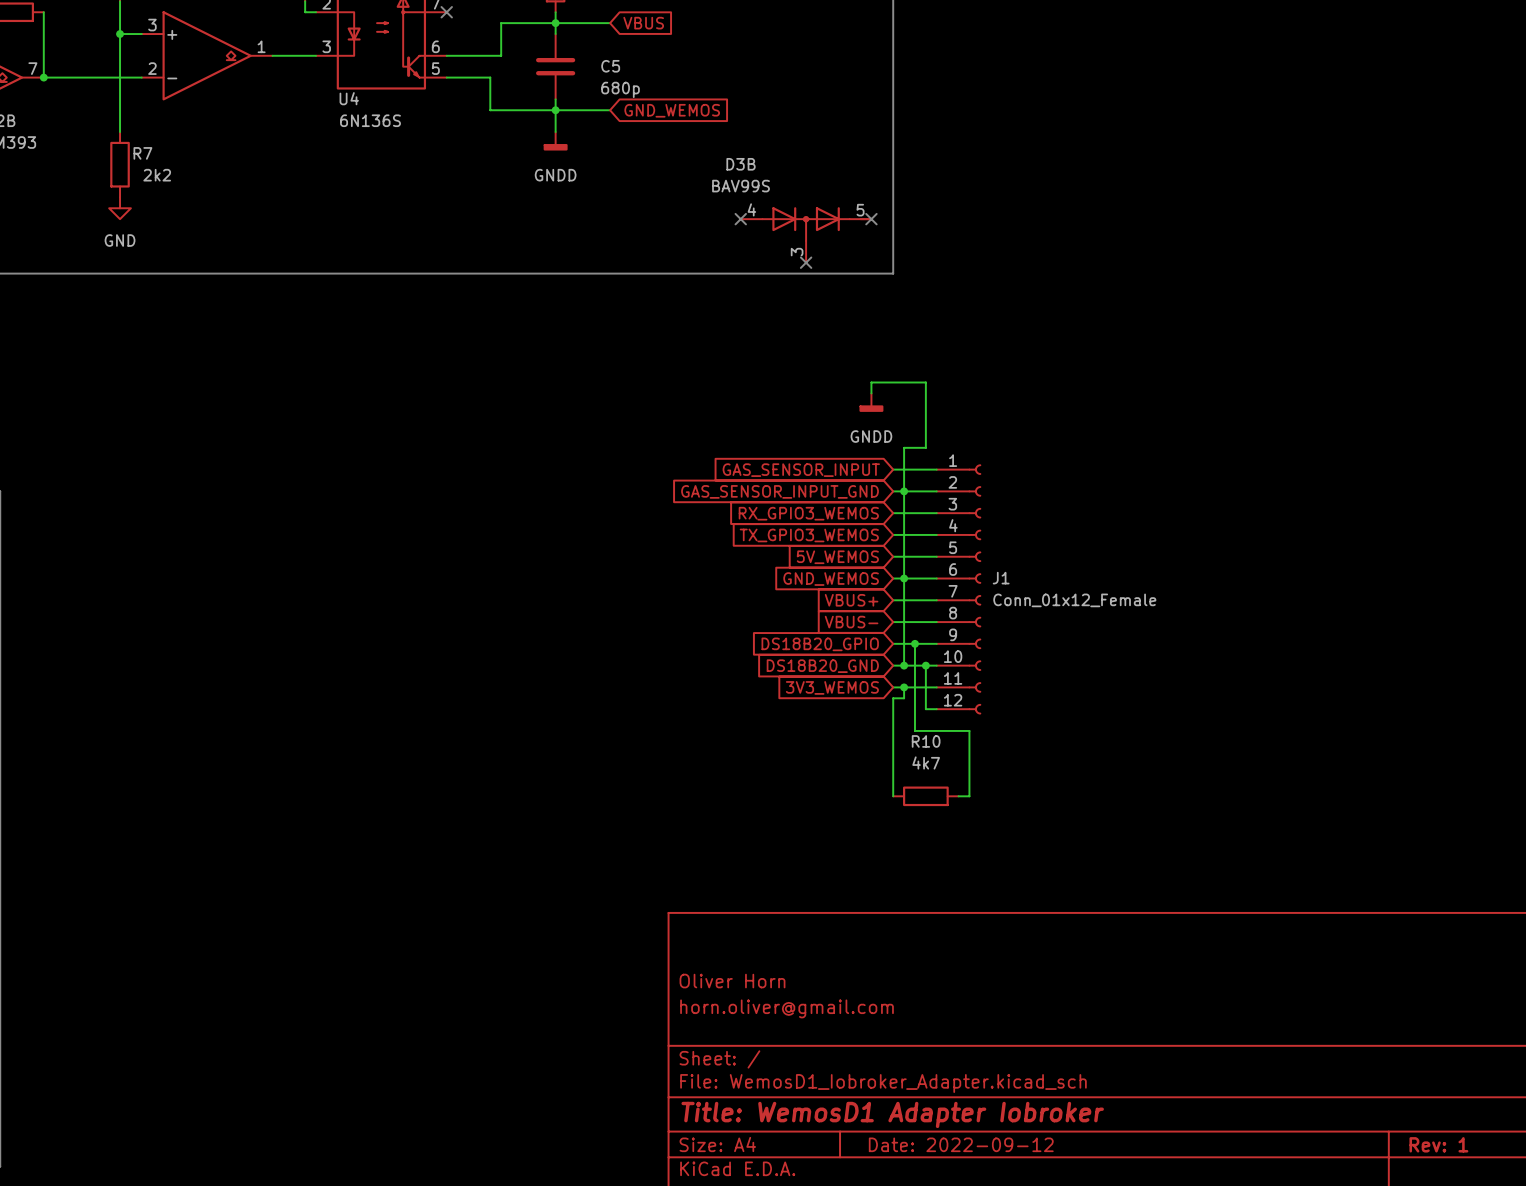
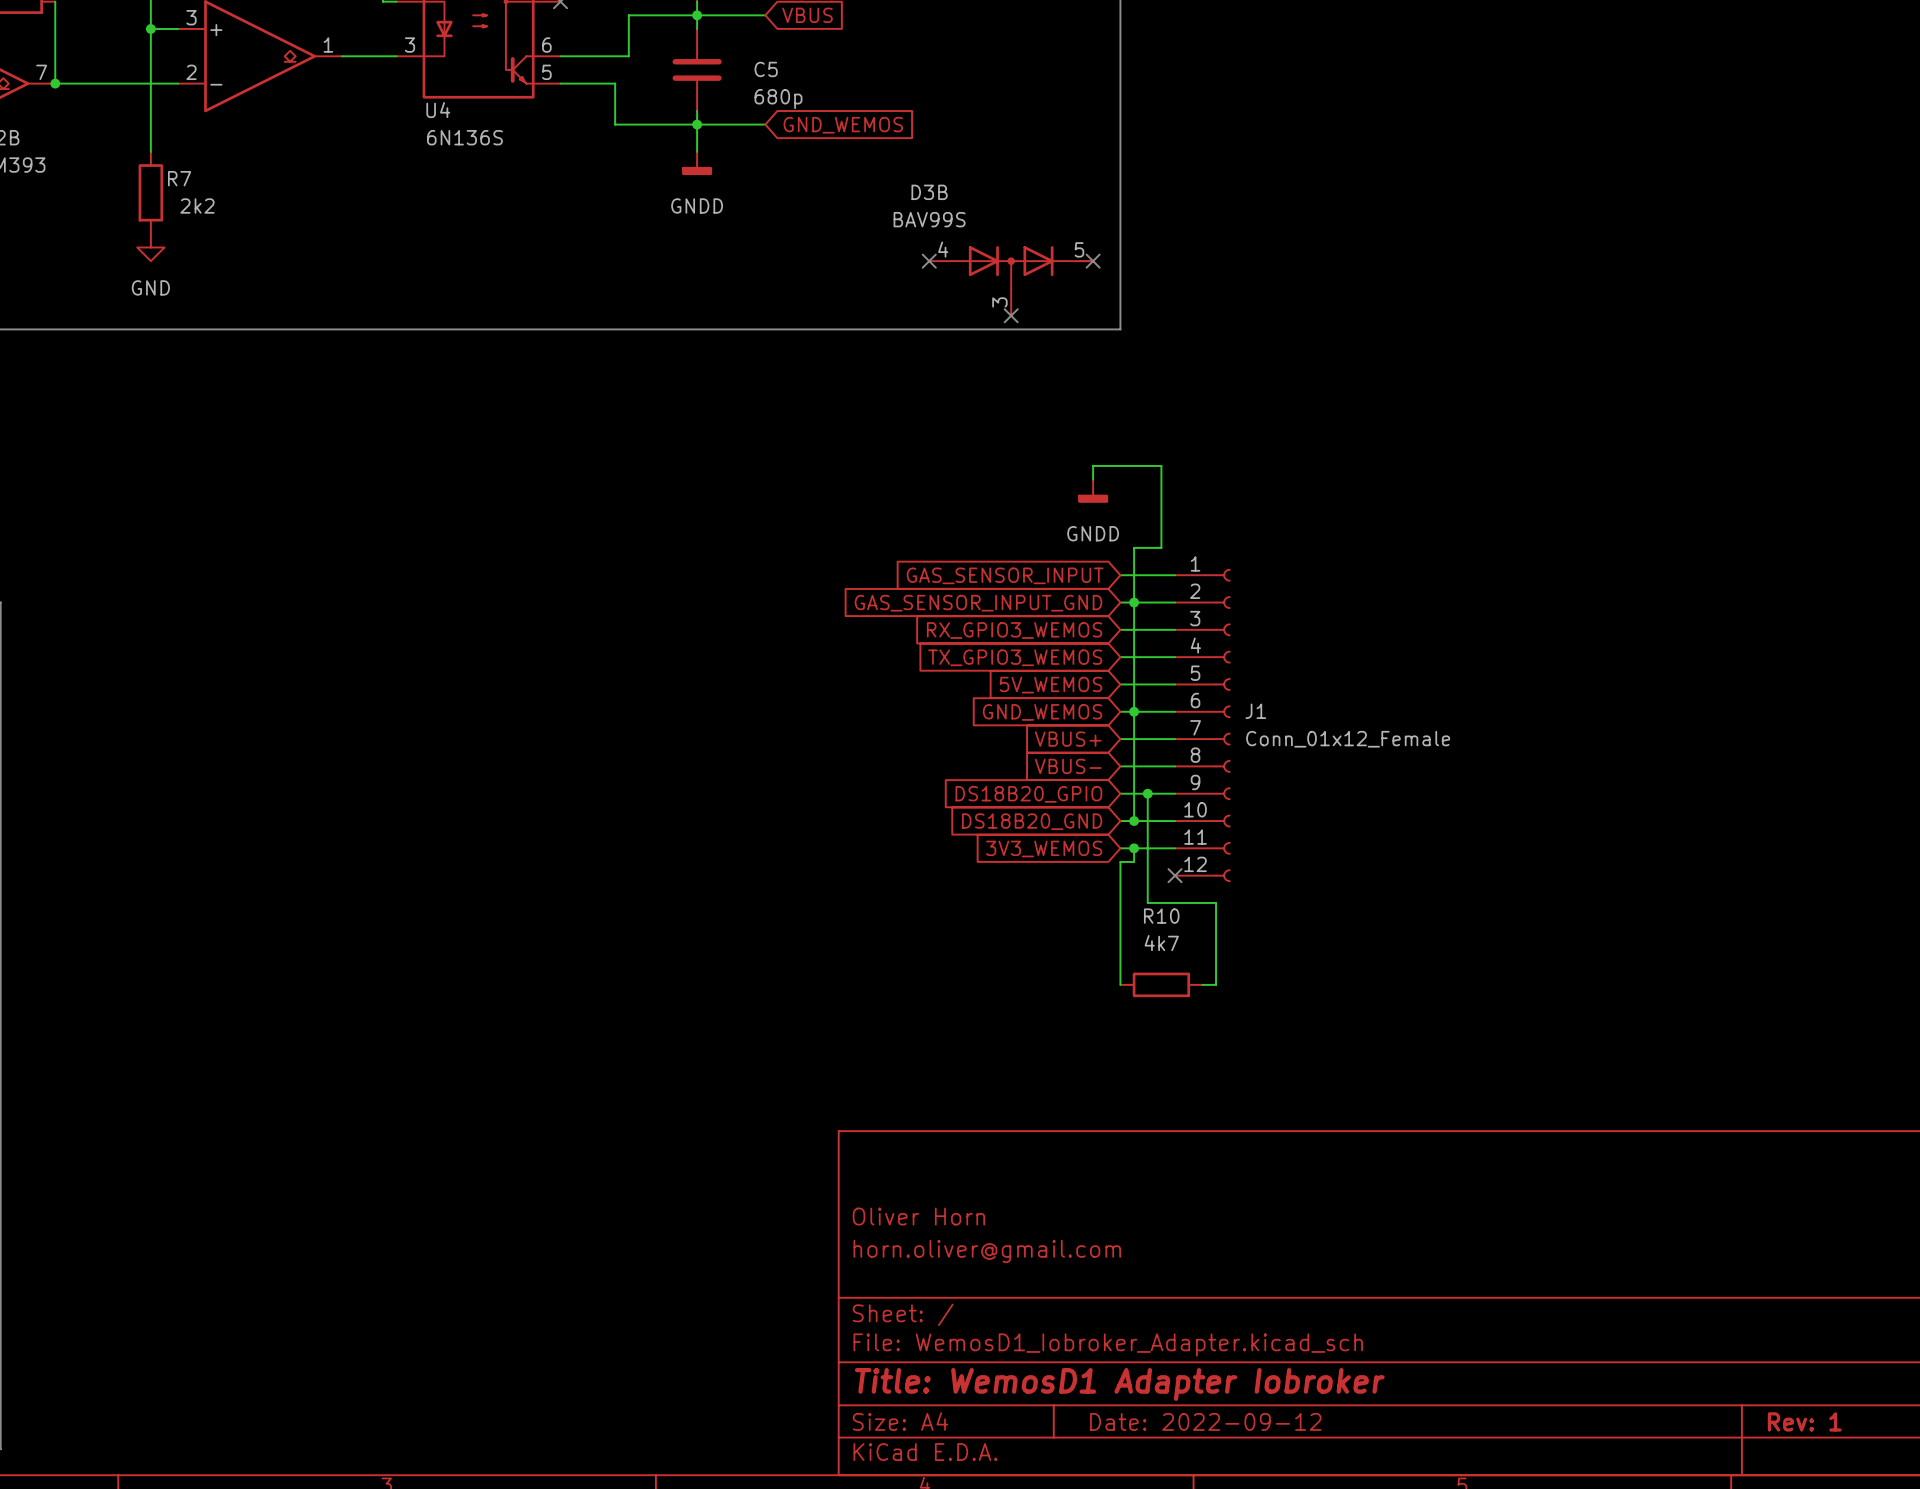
wire: (925, 665) (925, 709) (936, 709) -> none
junction: (925, 665) -> none
no-connect mark: none -> (1175, 875)

